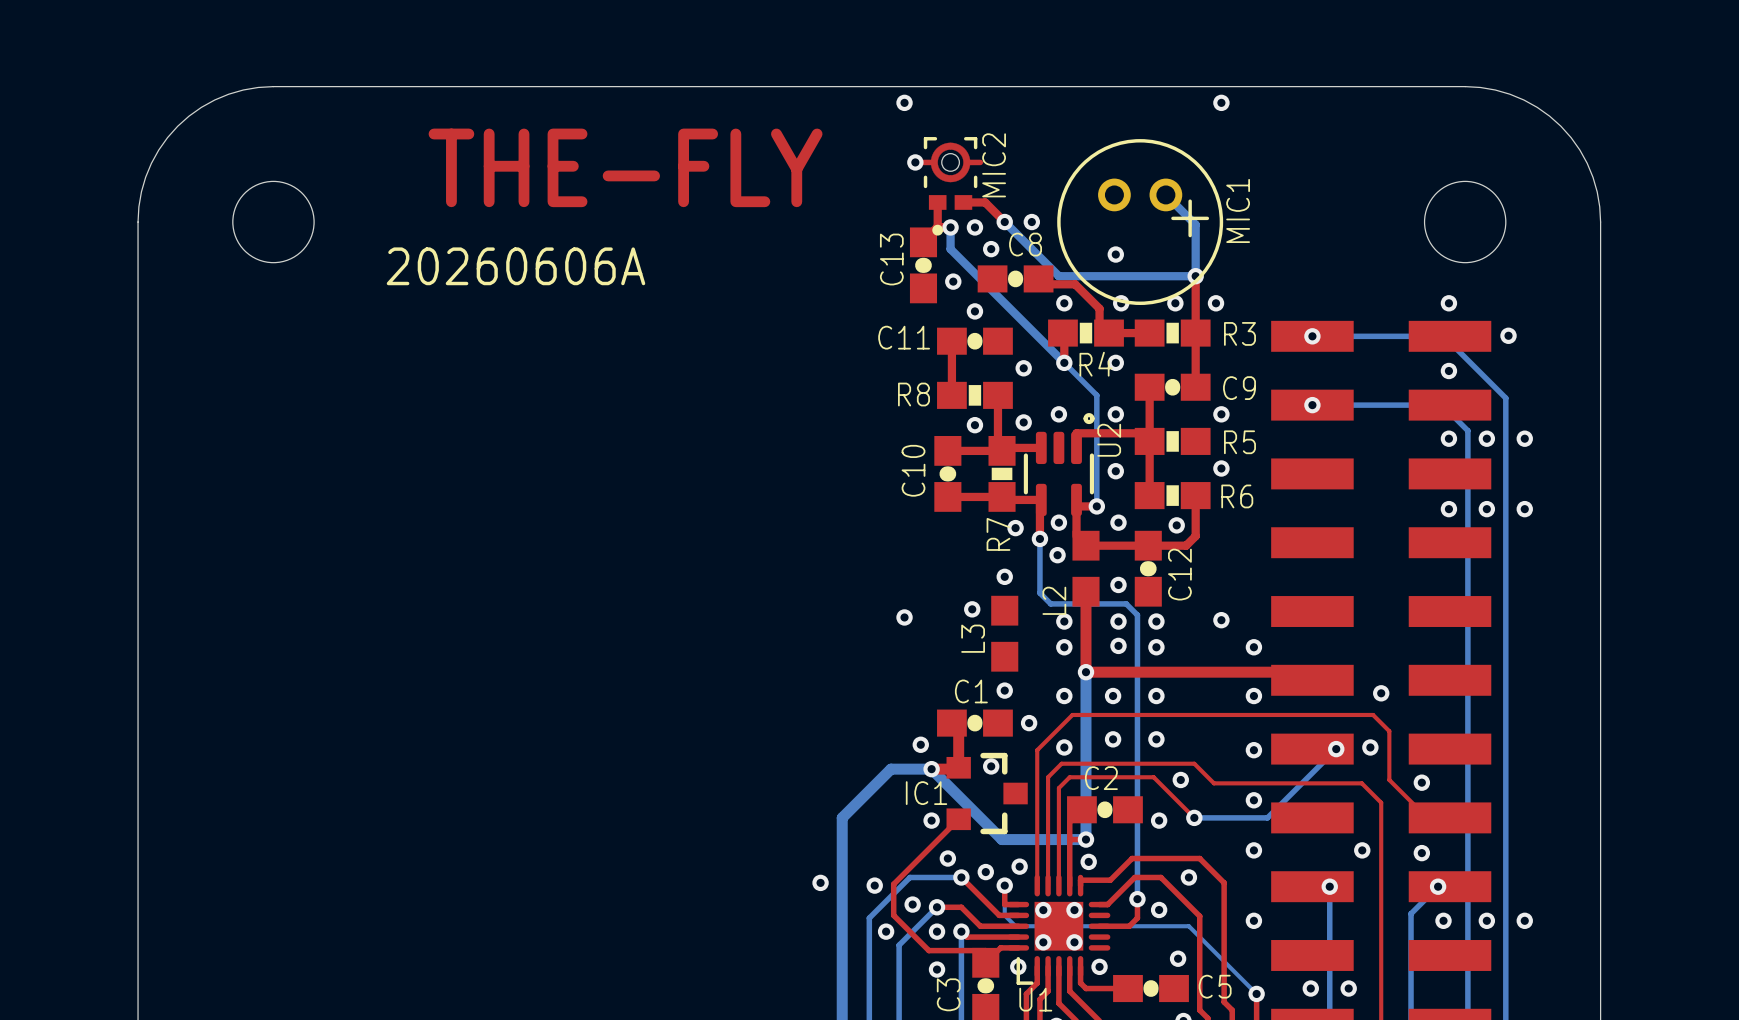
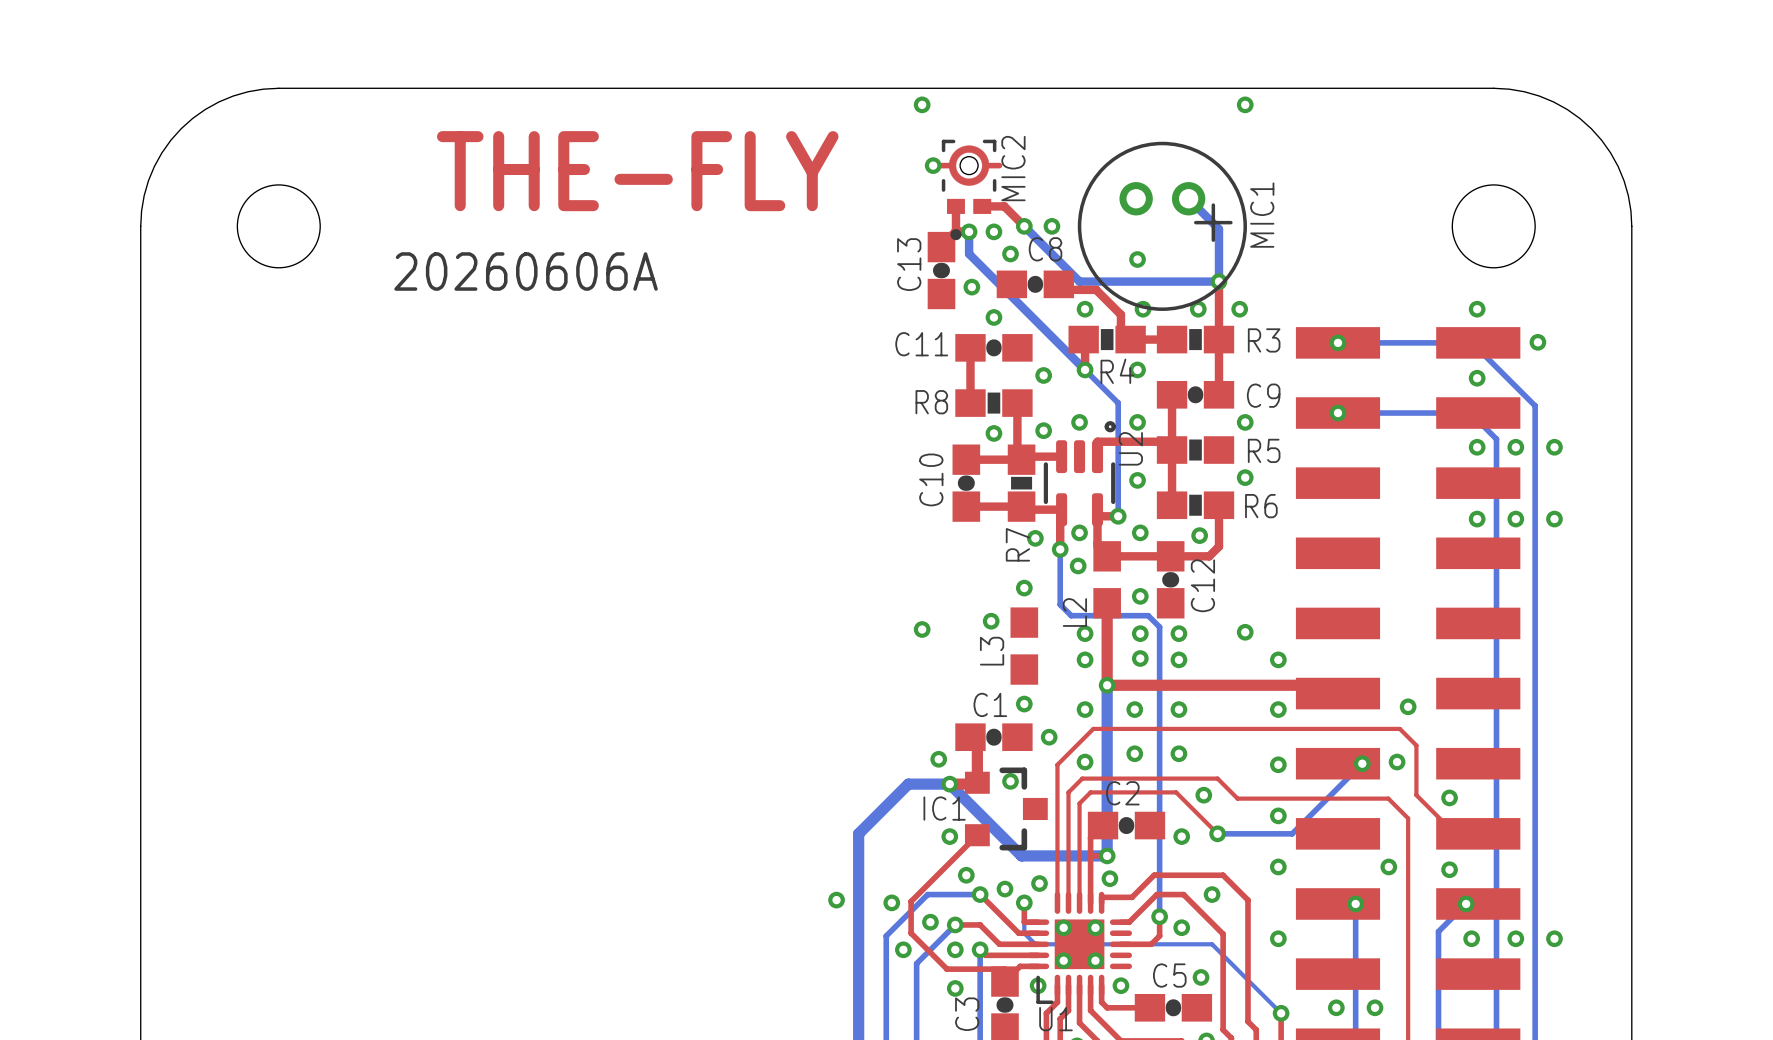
C5 name position: C5 (1215, 986) -> C5 (1169, 975)

